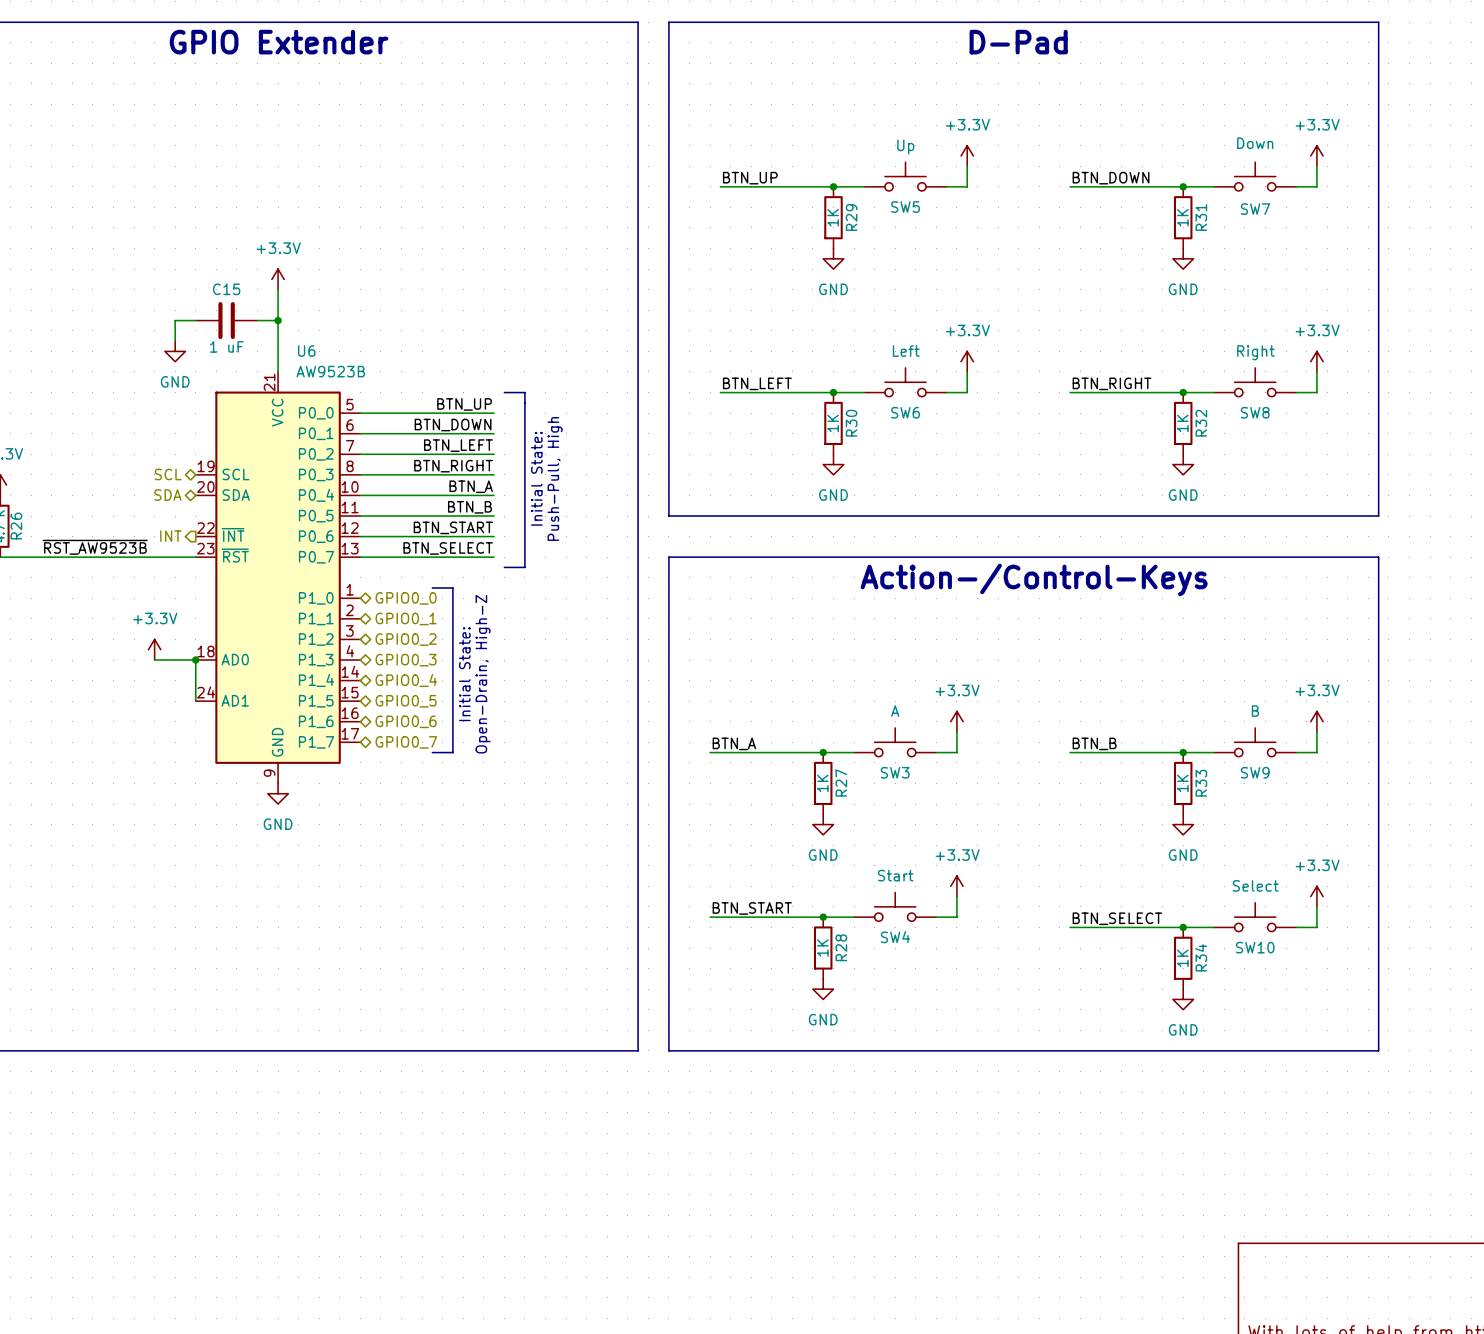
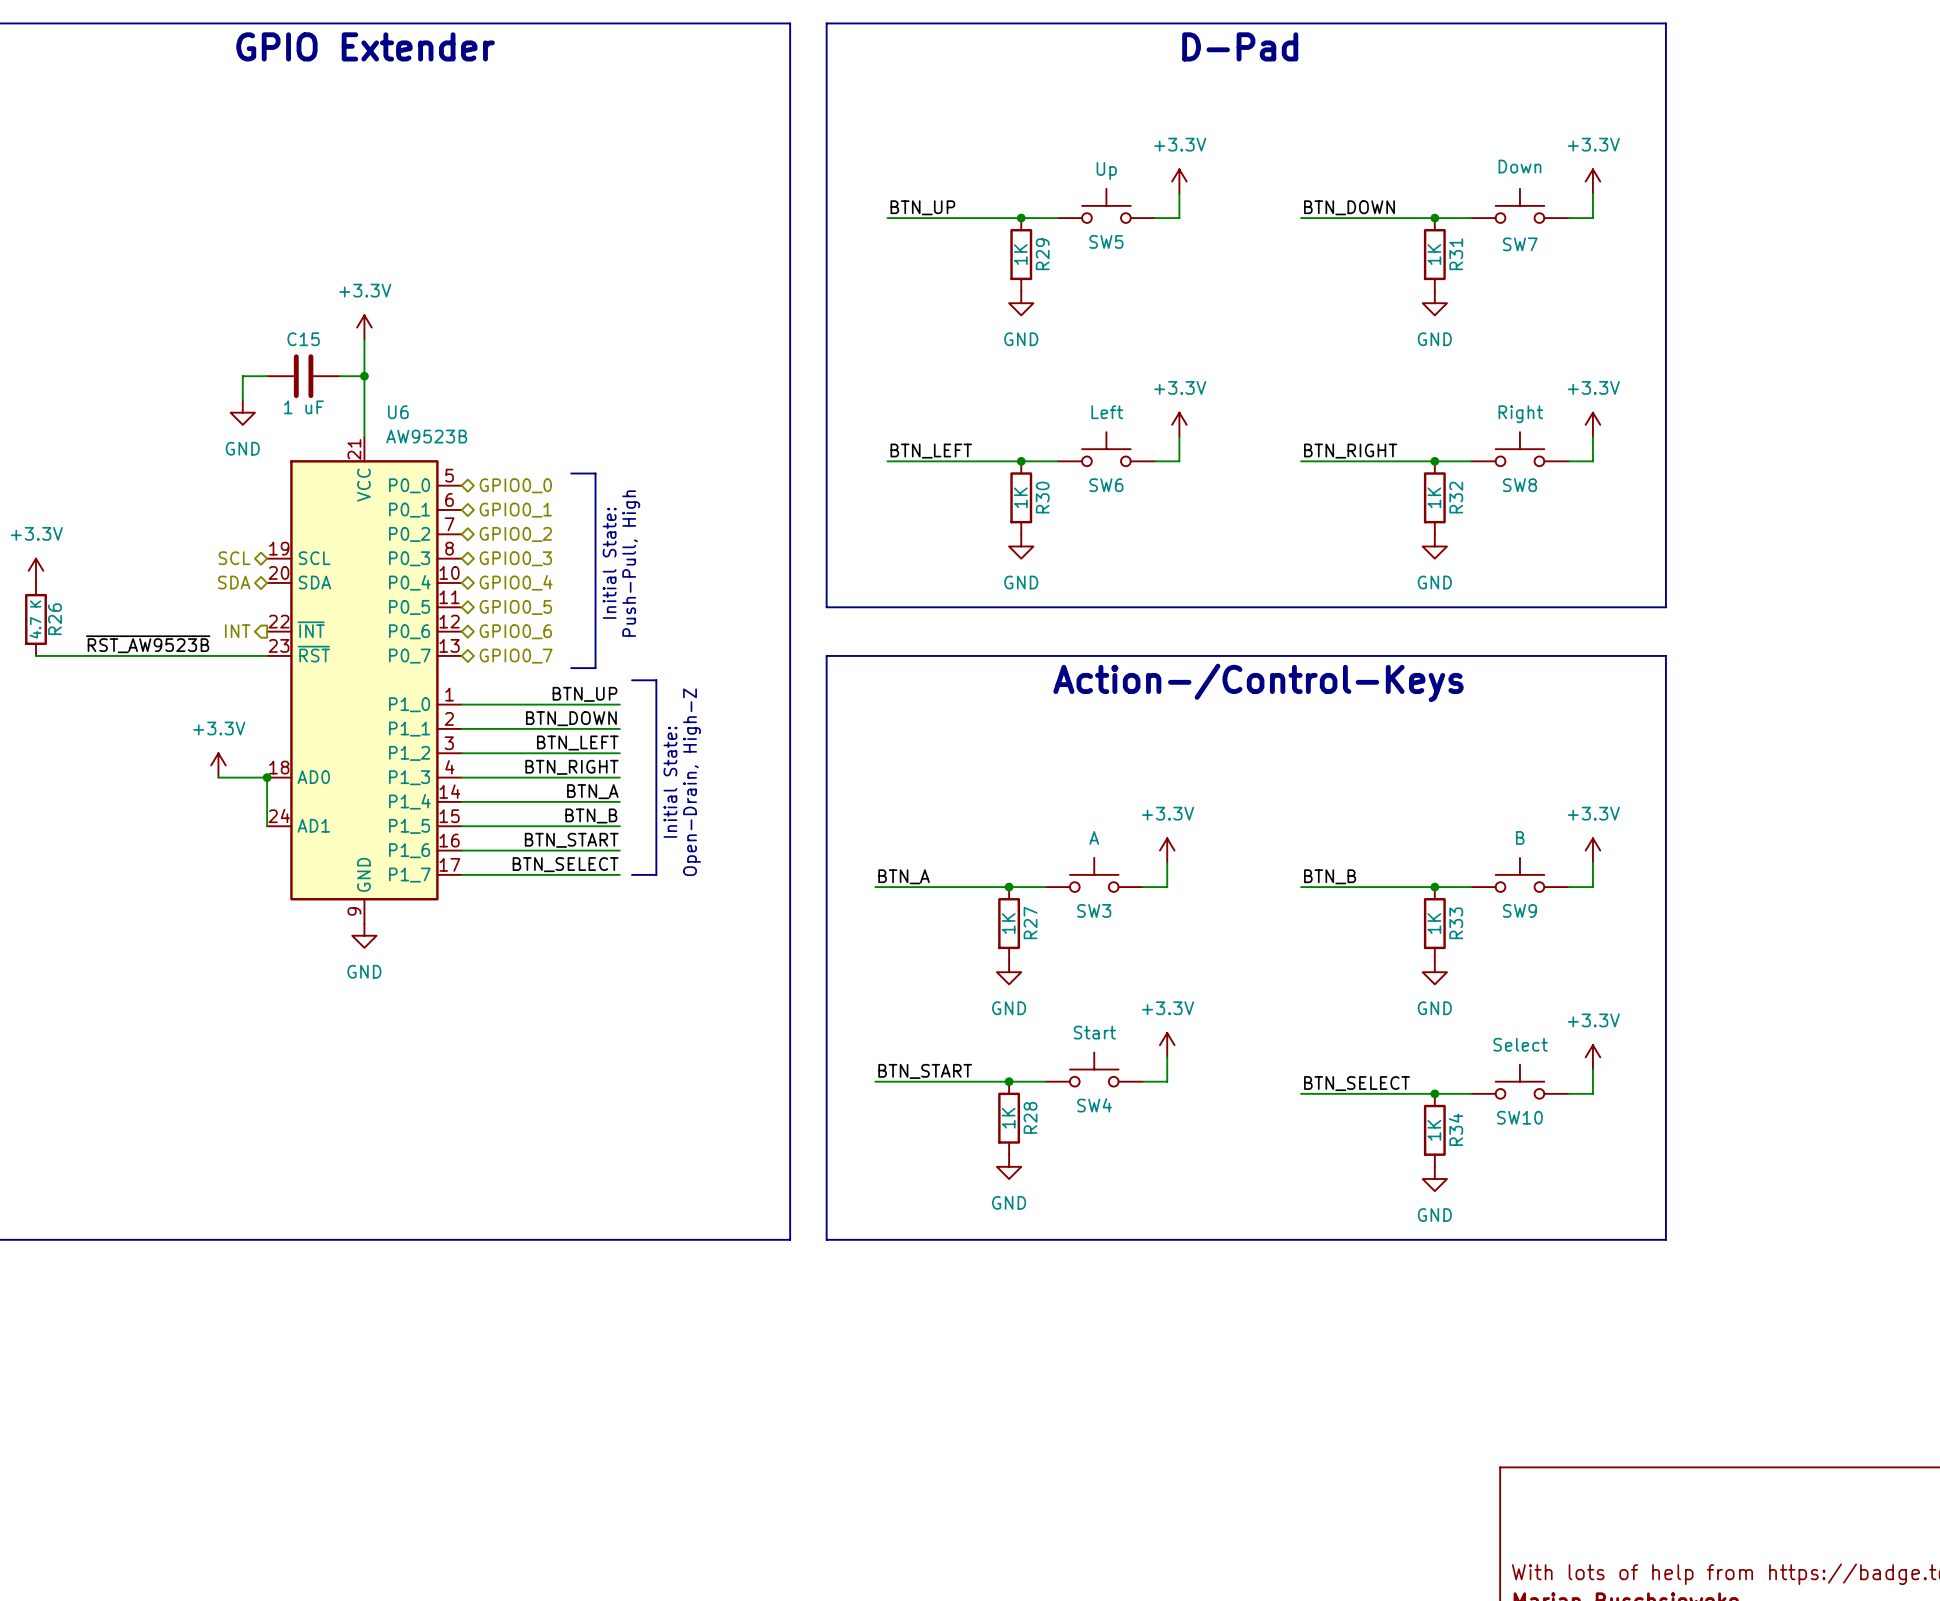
line: (504, 392) (524, 392) (524, 567) (504, 567) -> none
line: none -> (571, 473) (595, 473) (595, 668) (571, 668)
label position: BTN_UP (464, 404) -> BTN_UP (585, 694)
wire: (360, 413) (494, 413) -> (461, 704) (619, 704)
label position: BTN_DOWN (453, 425) -> BTN_DOWN (571, 718)
wire: (360, 433) (494, 433) -> (461, 728) (619, 728)
label position: BTN_LEFT (458, 445) -> BTN_LEFT (577, 742)
wire: (360, 454) (494, 454) -> (461, 753) (619, 753)
label position: BTN_RIGHT (453, 466) -> BTN_RIGHT (571, 767)
wire: (360, 474) (494, 474) -> (461, 777) (619, 777)
text position: Initial State: (536, 478) -> Initial State: (609, 563)
text position: Push-Pull, High (555, 479) -> Push-Pull, High (631, 563)
label position: BTN_A (471, 486) -> BTN_A (592, 791)
wire: (360, 495) (494, 495) -> (461, 801) (619, 801)
label position: BTN_B (469, 507) -> BTN_B (591, 815)
wire: (360, 516) (494, 516) -> (461, 826) (619, 826)
label position: BTN_START (453, 527) -> BTN_START (571, 840)
wire: (360, 536) (494, 536) -> (461, 850) (619, 850)
label position: BTN_SELECT (448, 548) -> BTN_SELECT (565, 864)
wire: (360, 557) (494, 557) -> (461, 874) (619, 874)
line: (432, 588) (452, 588) (452, 752) (432, 752) -> (632, 680) (656, 680) (656, 874) (632, 874)
hierarchical label position: GPIO0_0 (406, 598) -> GPIO0_0 (515, 485)
hierarchical label position: GPIO0_1 (406, 618) -> GPIO0_1 (515, 510)
hierarchical label position: GPIO0_2 (406, 639) -> GPIO0_2 (515, 534)
hierarchical label position: GPIO0_3 (406, 660) -> GPIO0_3 (515, 558)
text position: Initial State: (464, 674) -> Initial State: (670, 782)
text position: Open-Drain, High-Z (483, 674) -> Open-Drain, High-Z (692, 782)
hierarchical label position: GPIO0_4 (406, 680) -> GPIO0_4 (516, 582)
hierarchical label position: GPIO0_5 (406, 701) -> GPIO0_5 (515, 607)
hierarchical label position: GPIO0_6 (406, 721) -> GPIO0_6 (515, 631)
hierarchical label position: GPIO0_7 (406, 742) -> GPIO0_7 (516, 656)

